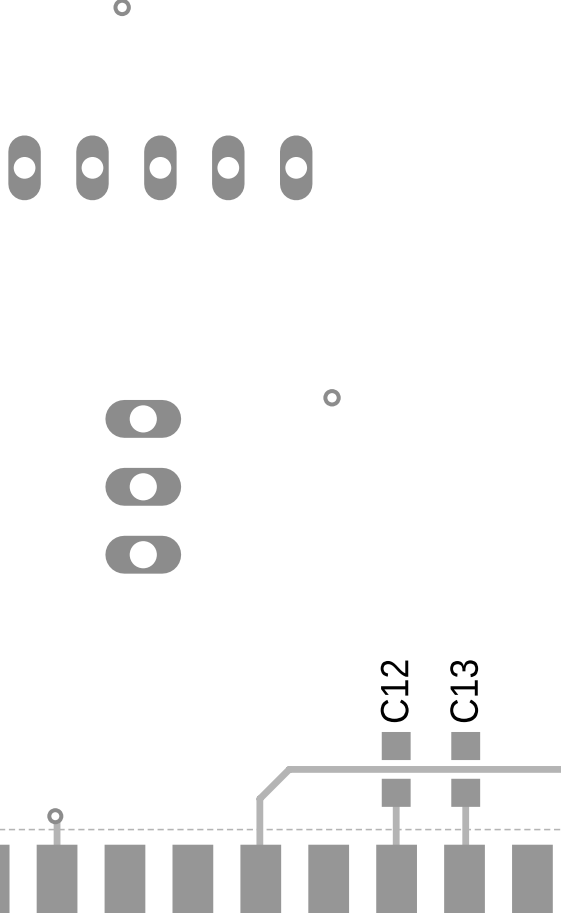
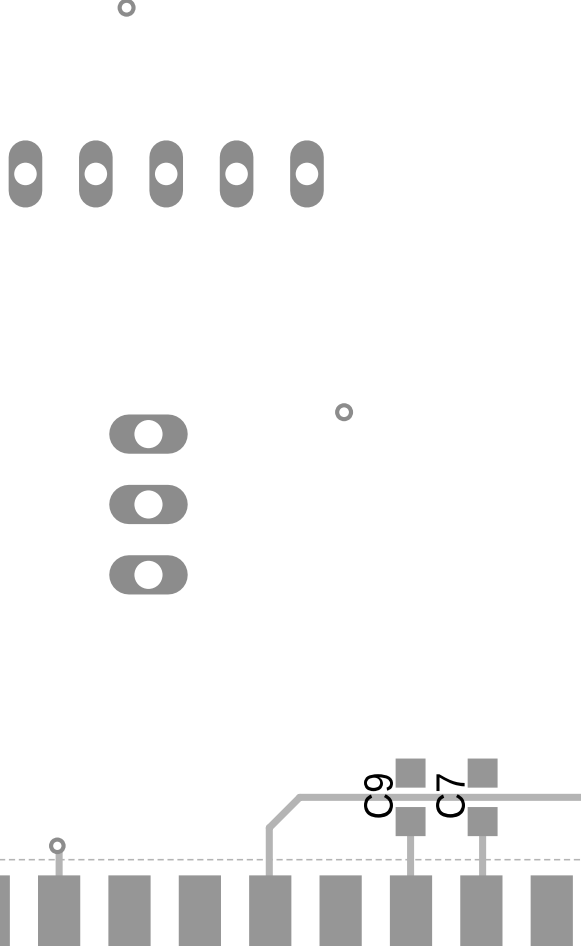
C12 name: C12 (394, 691) -> C9 (378, 795)
C13 name: C13 (464, 691) -> C7 (450, 795)

